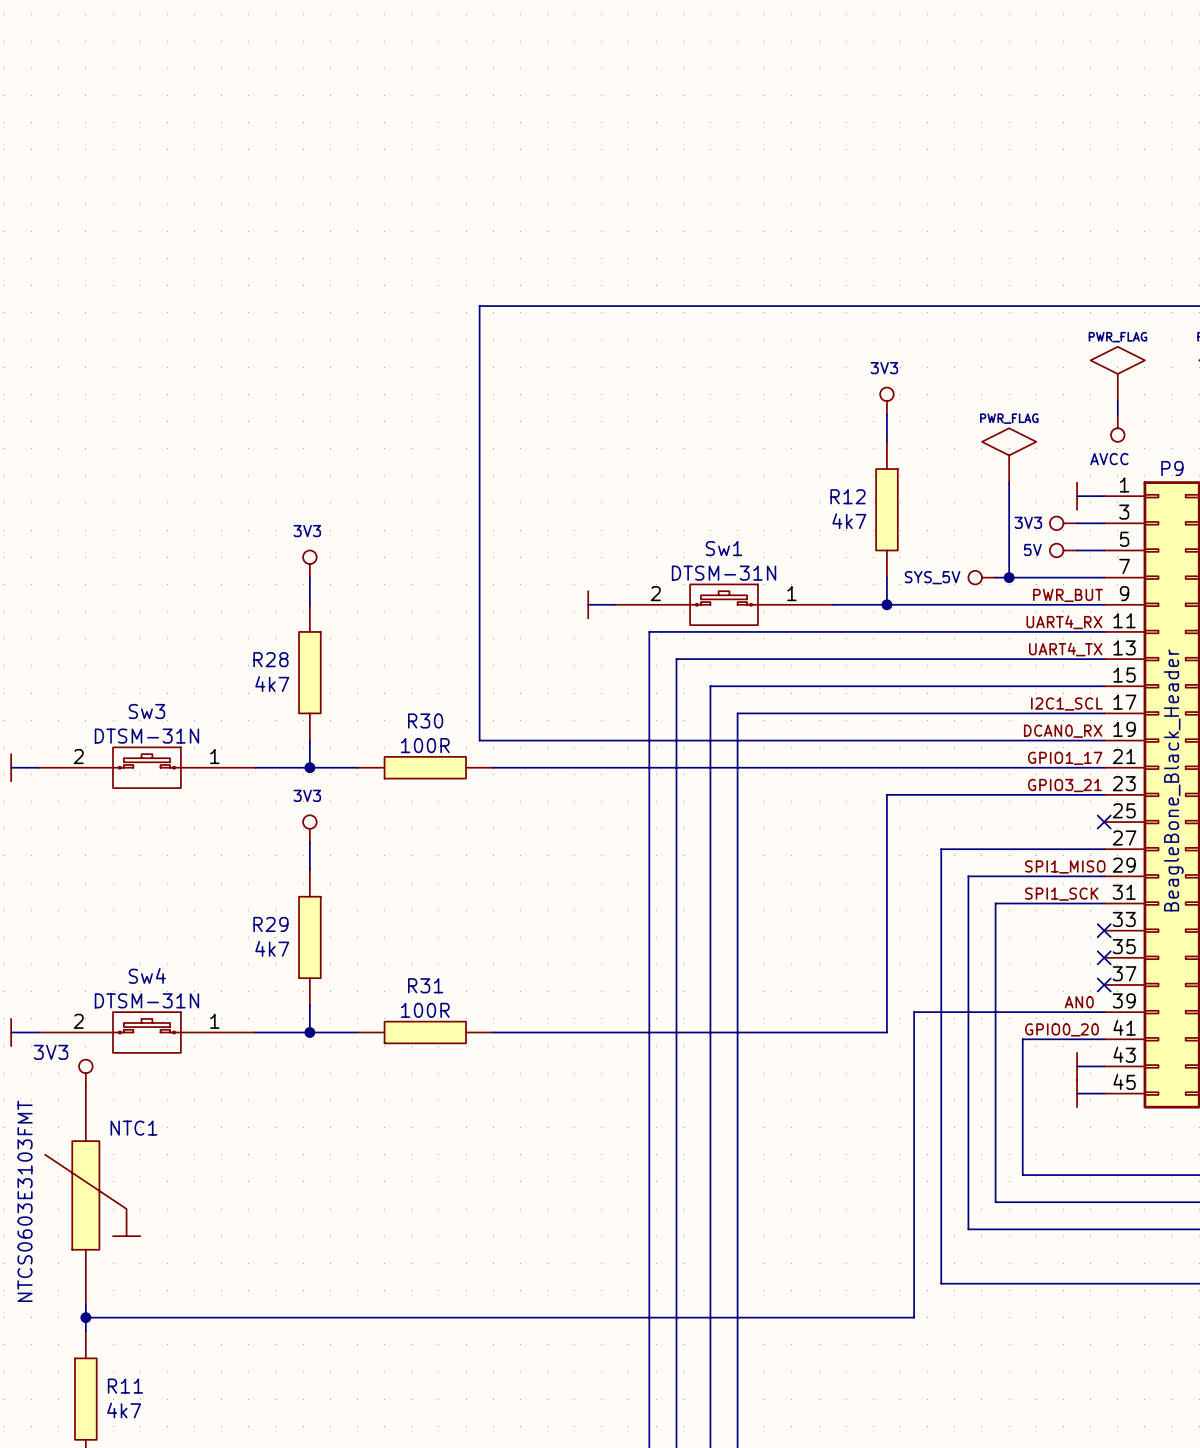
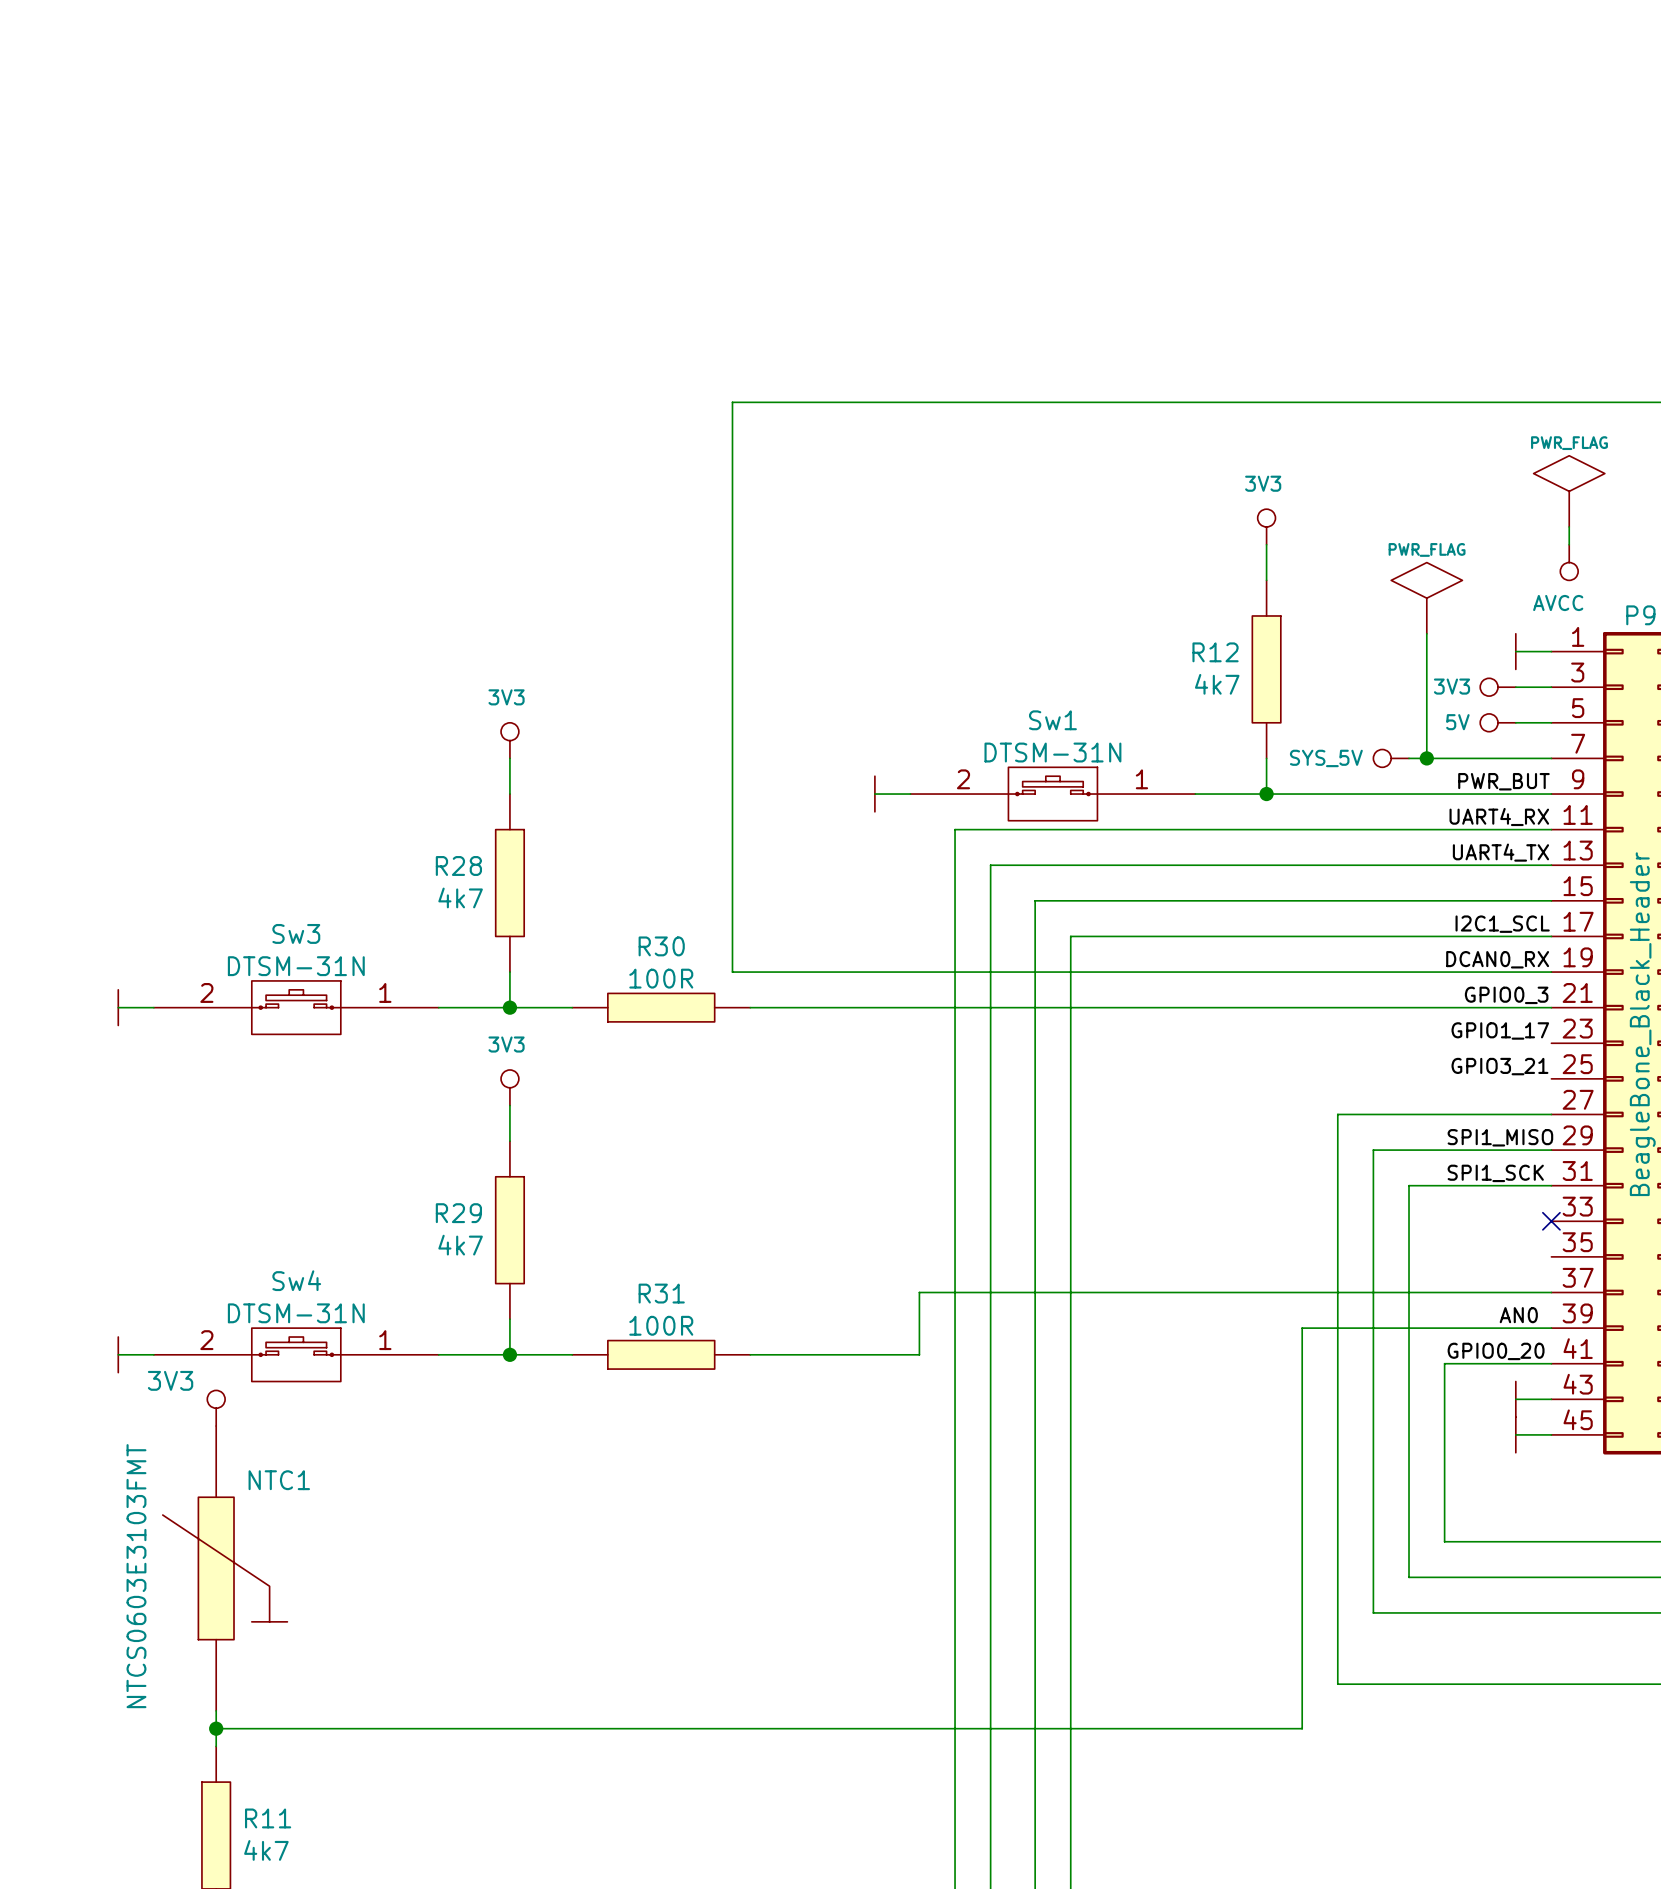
label: GPIO1_17 (1065, 758) -> GPIO0_3 (1506, 995)
label: GPIO3_21 (1064, 785) -> GPIO1_17 (1500, 1030)
wire: (1104, 794) (886, 794) (886, 1032) (622, 1032) -> (1551, 1292) (919, 1292) (919, 1354)
label: none -> GPIO3_21 (1499, 1066)
no-connect mark: (1104, 822) -> none
no-connect mark: (1104, 957) -> none
no-connect mark: (1104, 984) -> none

